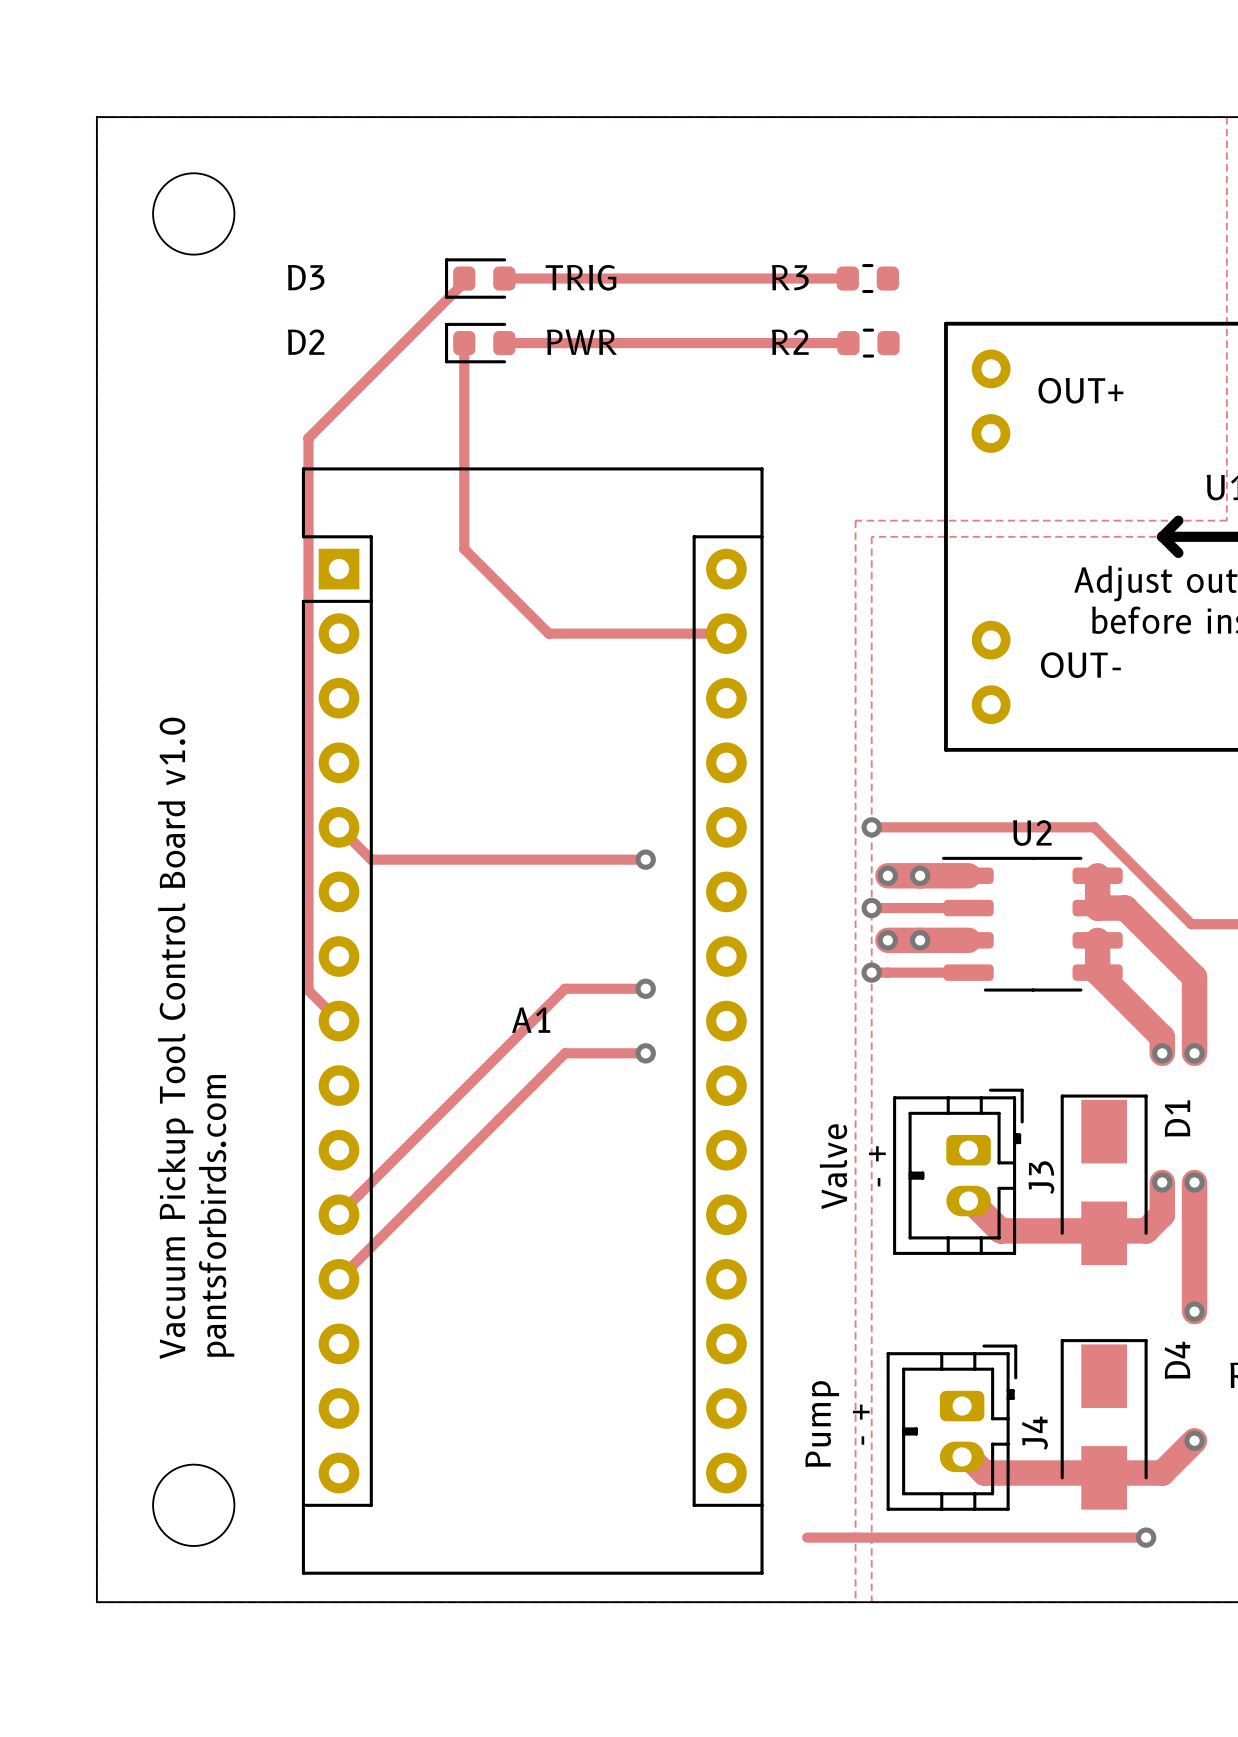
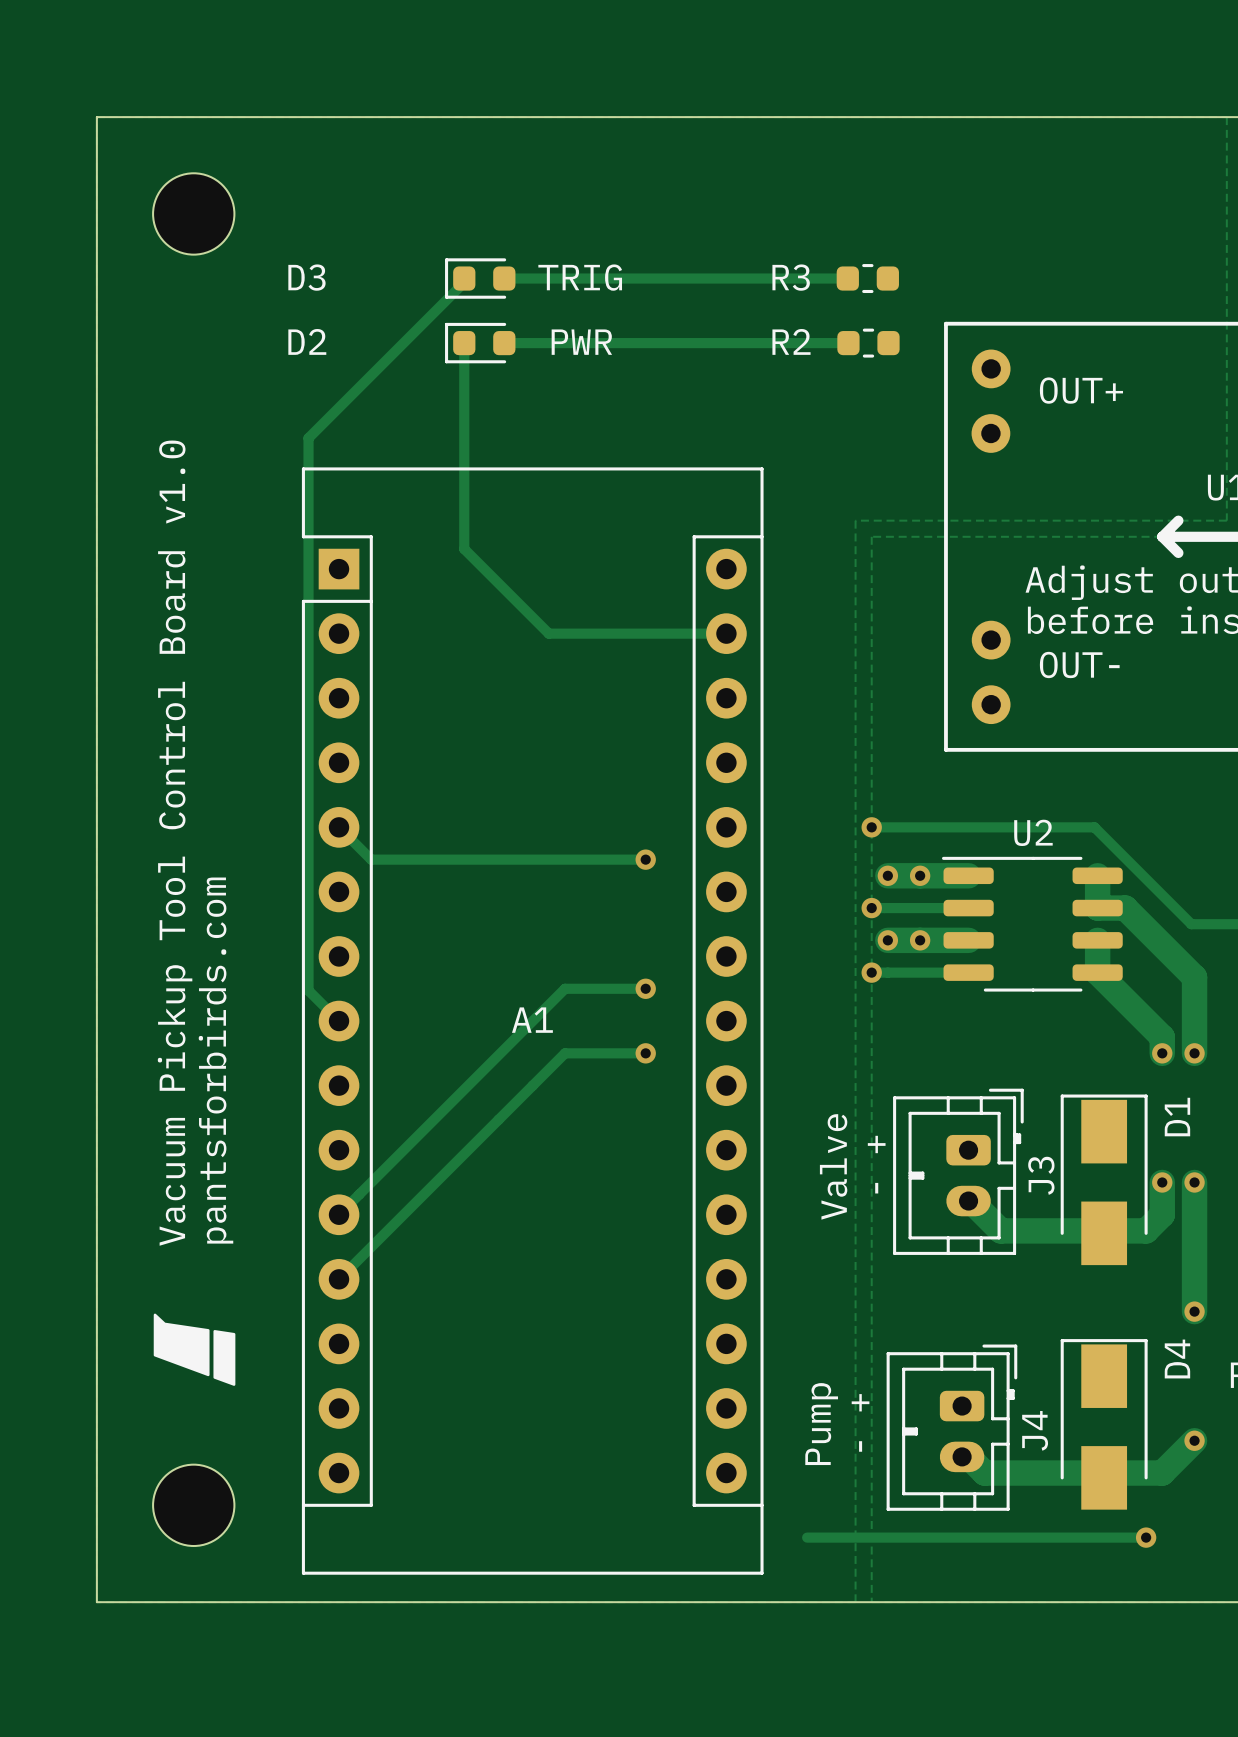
text position: Vacuum Pickup Tool Control Board v1.0 (175, 1038) -> Vacuum Pickup Tool Control Board v1.0 (175, 843)
text position: pantsforbirds.com (216, 1215) -> pantsforbirds.com (215, 1060)
drawing: none -> [153, 1313, 236, 1386]

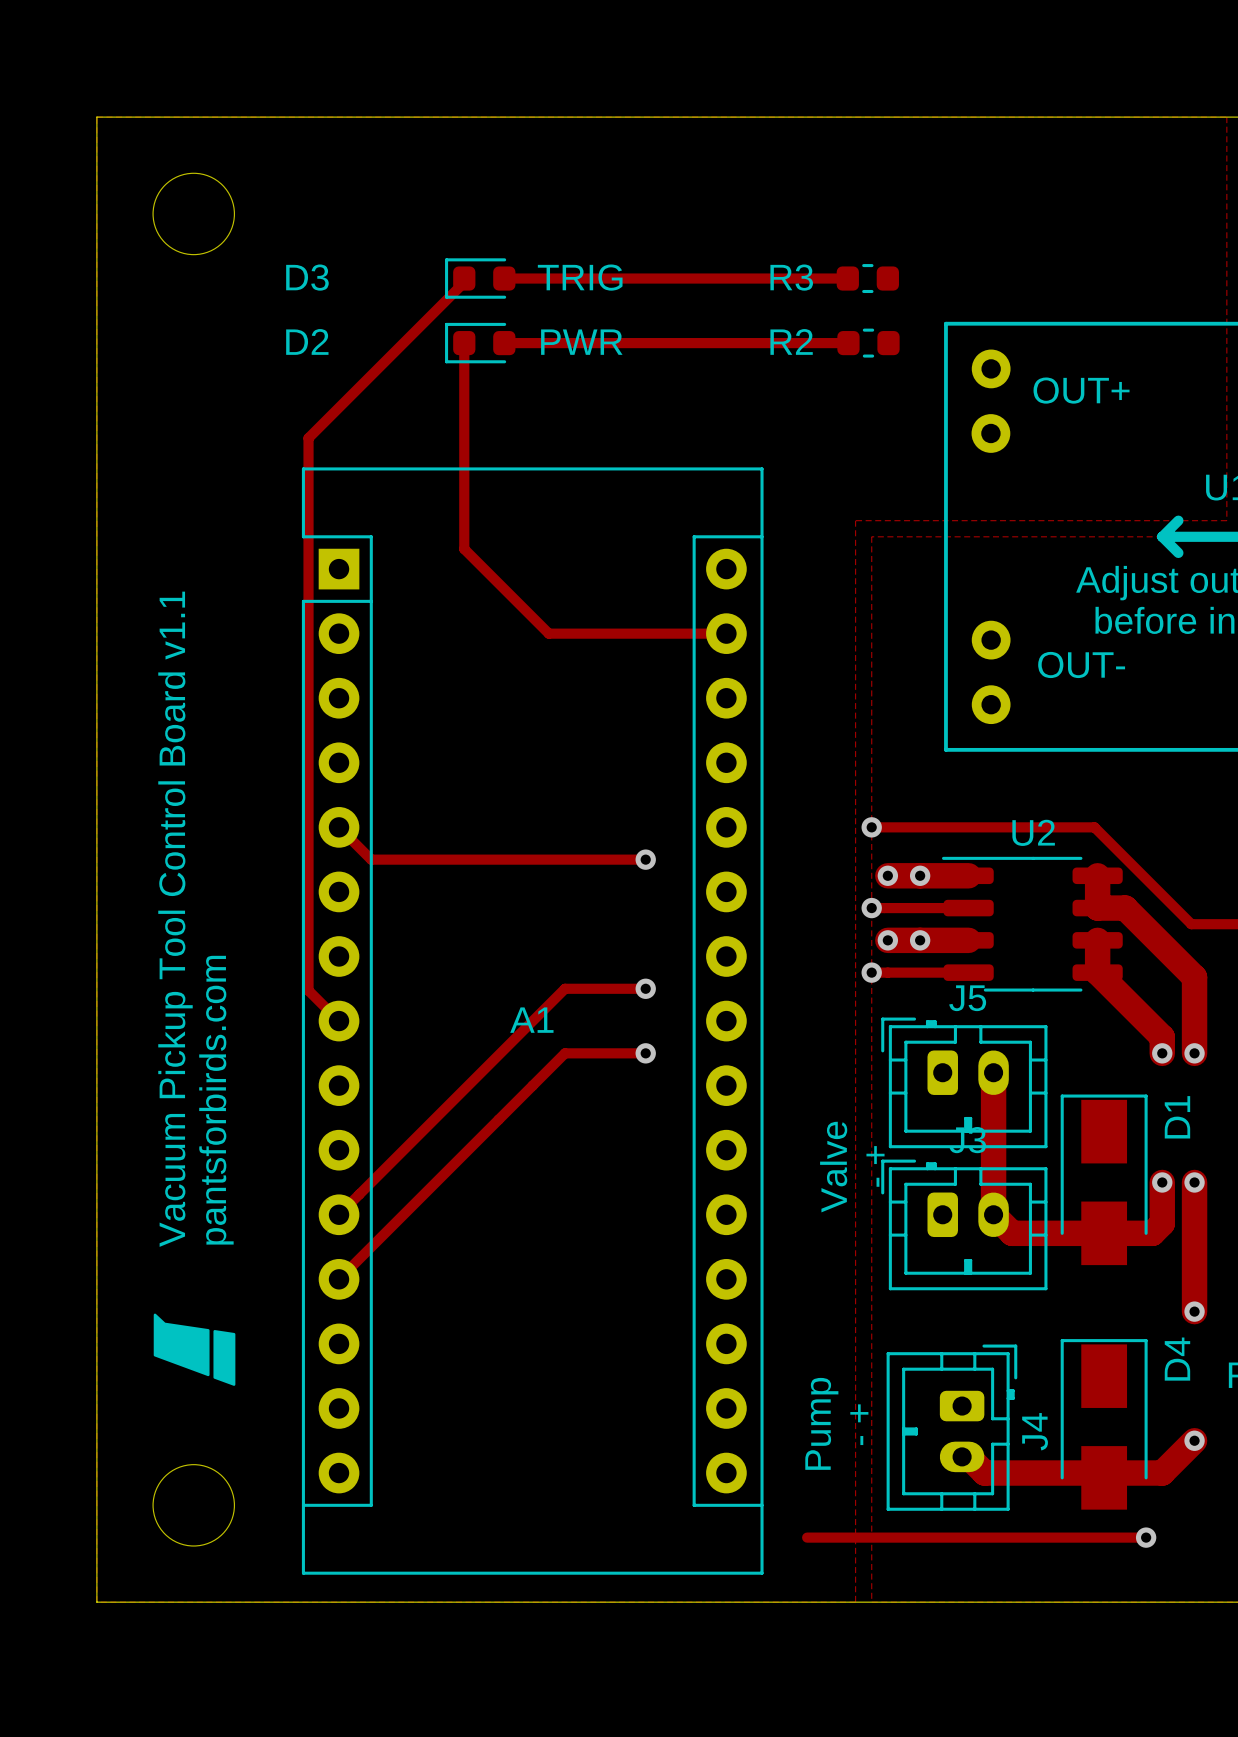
text: Vacuum Pickup Tool Control Board v1.0 (175, 843) -> Vacuum Pickup Tool Control Board v1.1 (175, 919)
J5: none -> (964, 1082)
J3 rotation: 0° (958, 1171) -> 90° counterclockwise (964, 1224)
track: (968, 1198) (1000, 1230) (1146, 1230) (1162, 1214) -> (993, 1072) (993, 1214) (1012, 1233) (1152, 1233) (1162, 1223) (1162, 1214)

